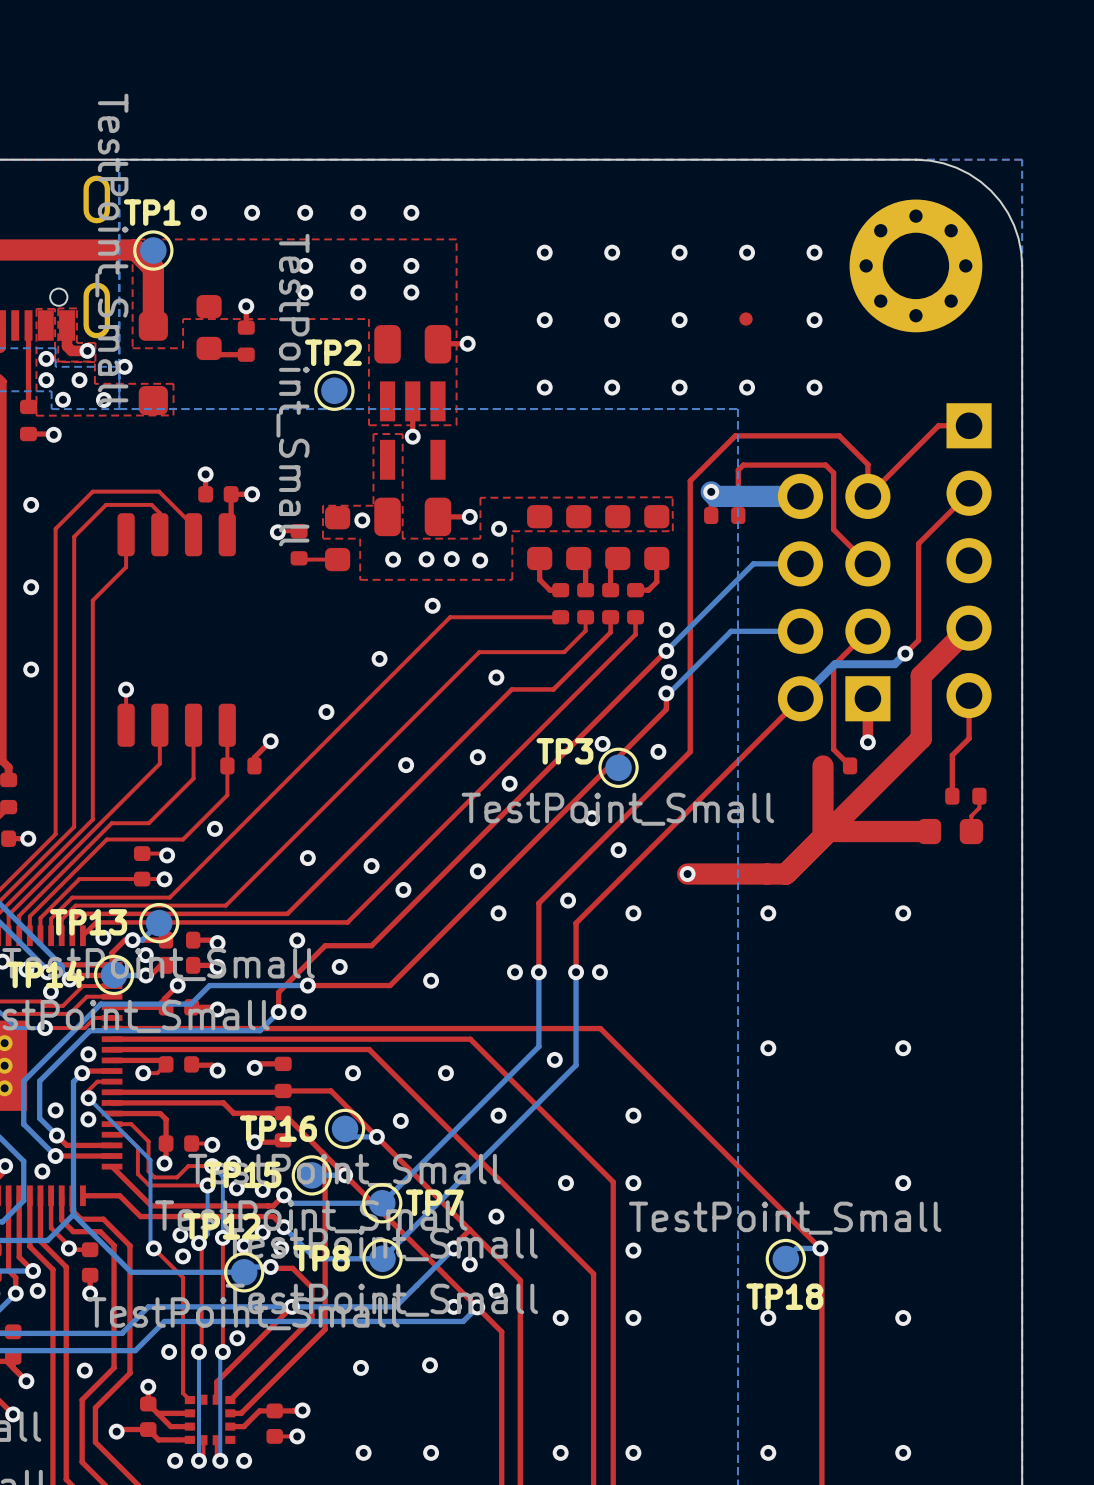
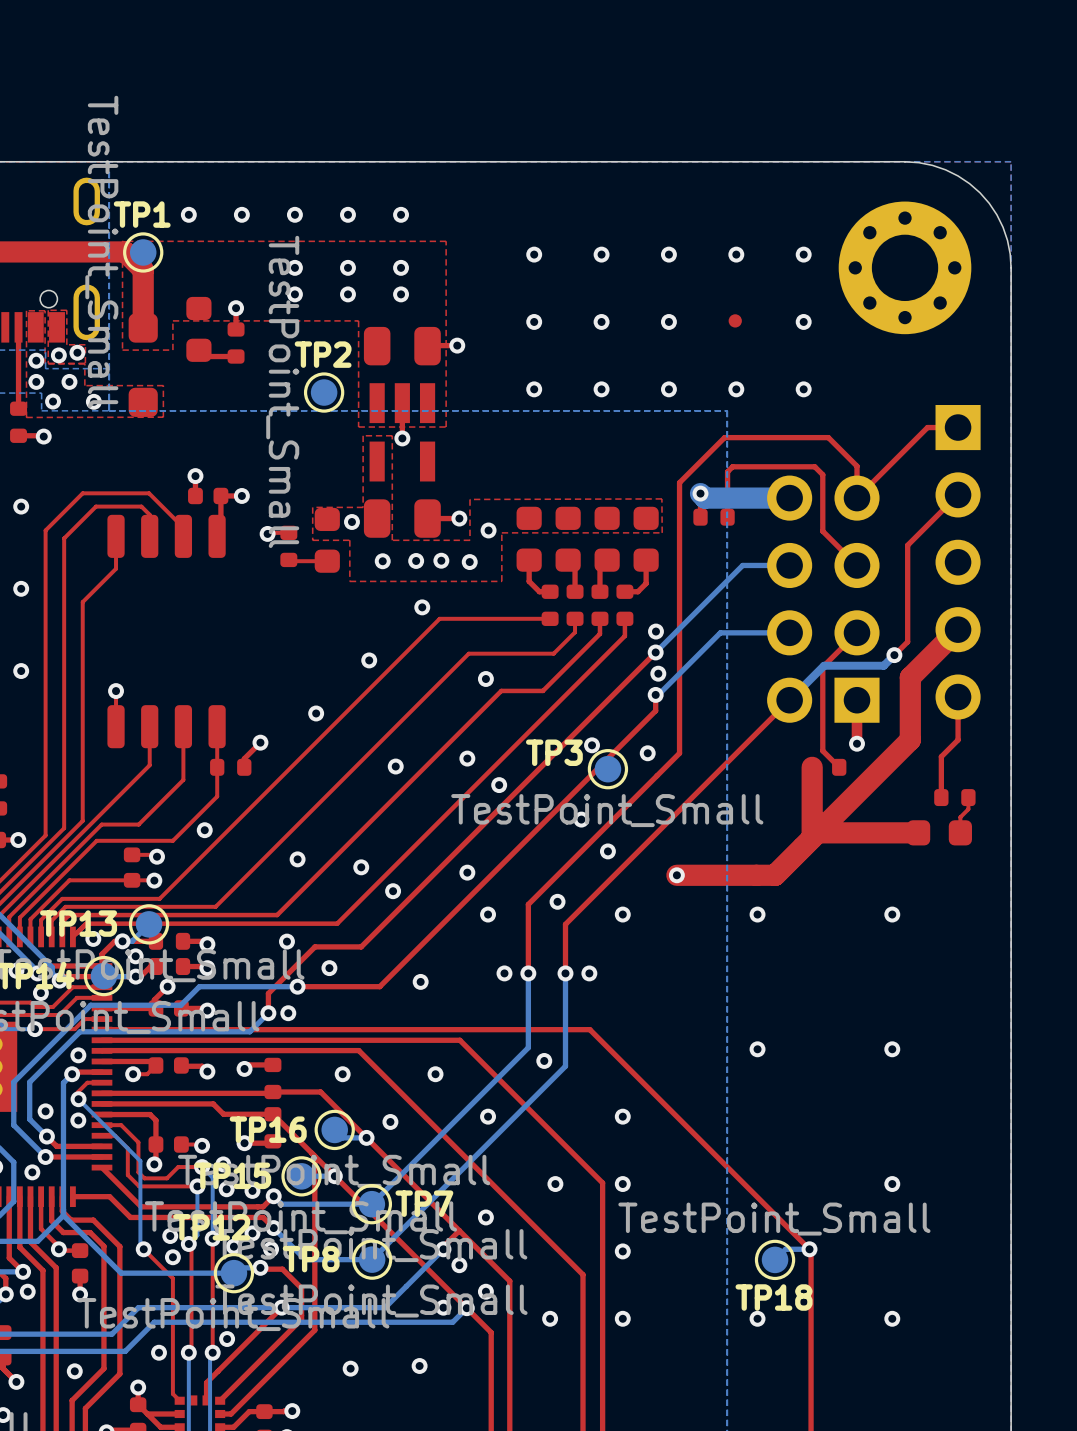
top track: (67, 325) (67, 346) (71, 350) (87, 350) -> none
via position: (124, 366) -> (58, 355)

